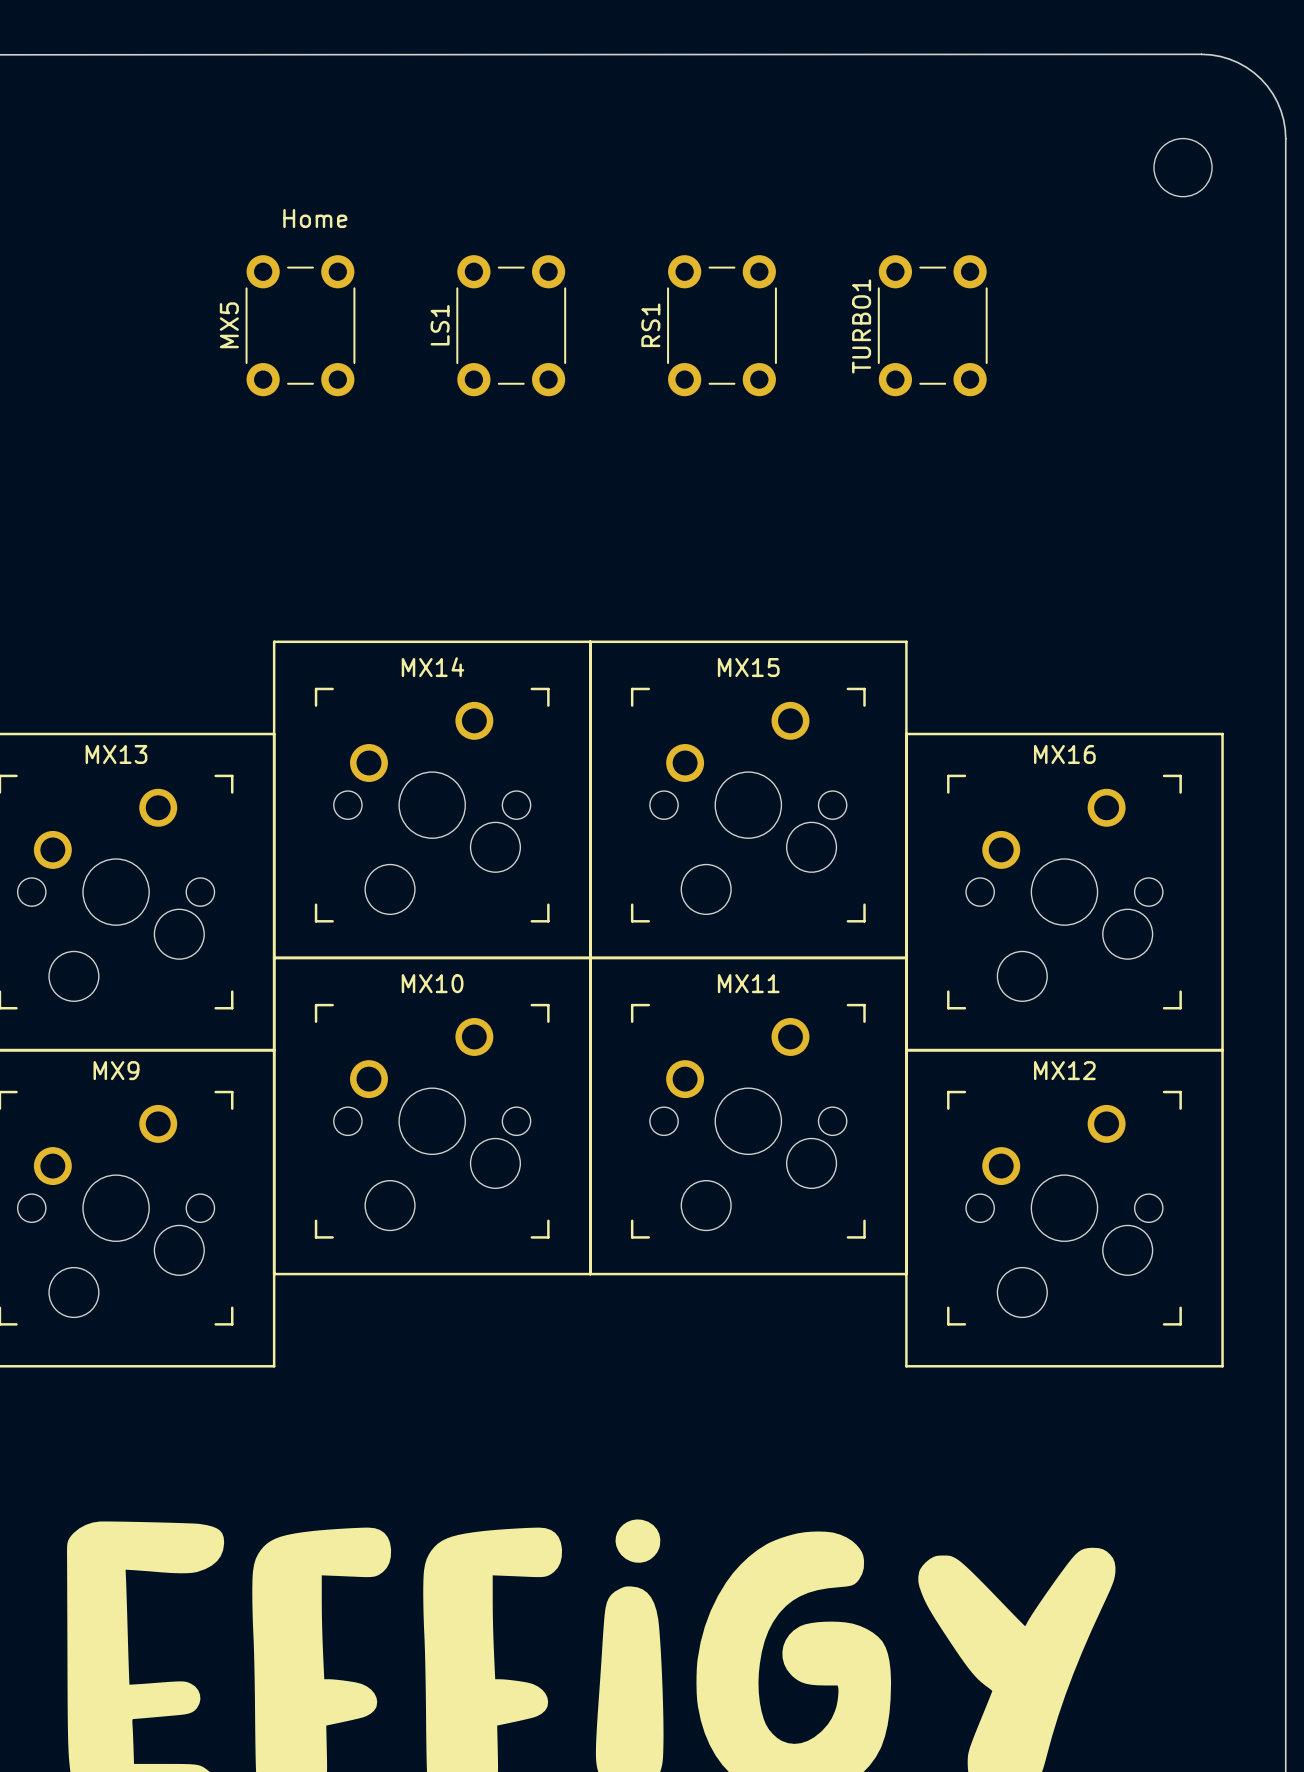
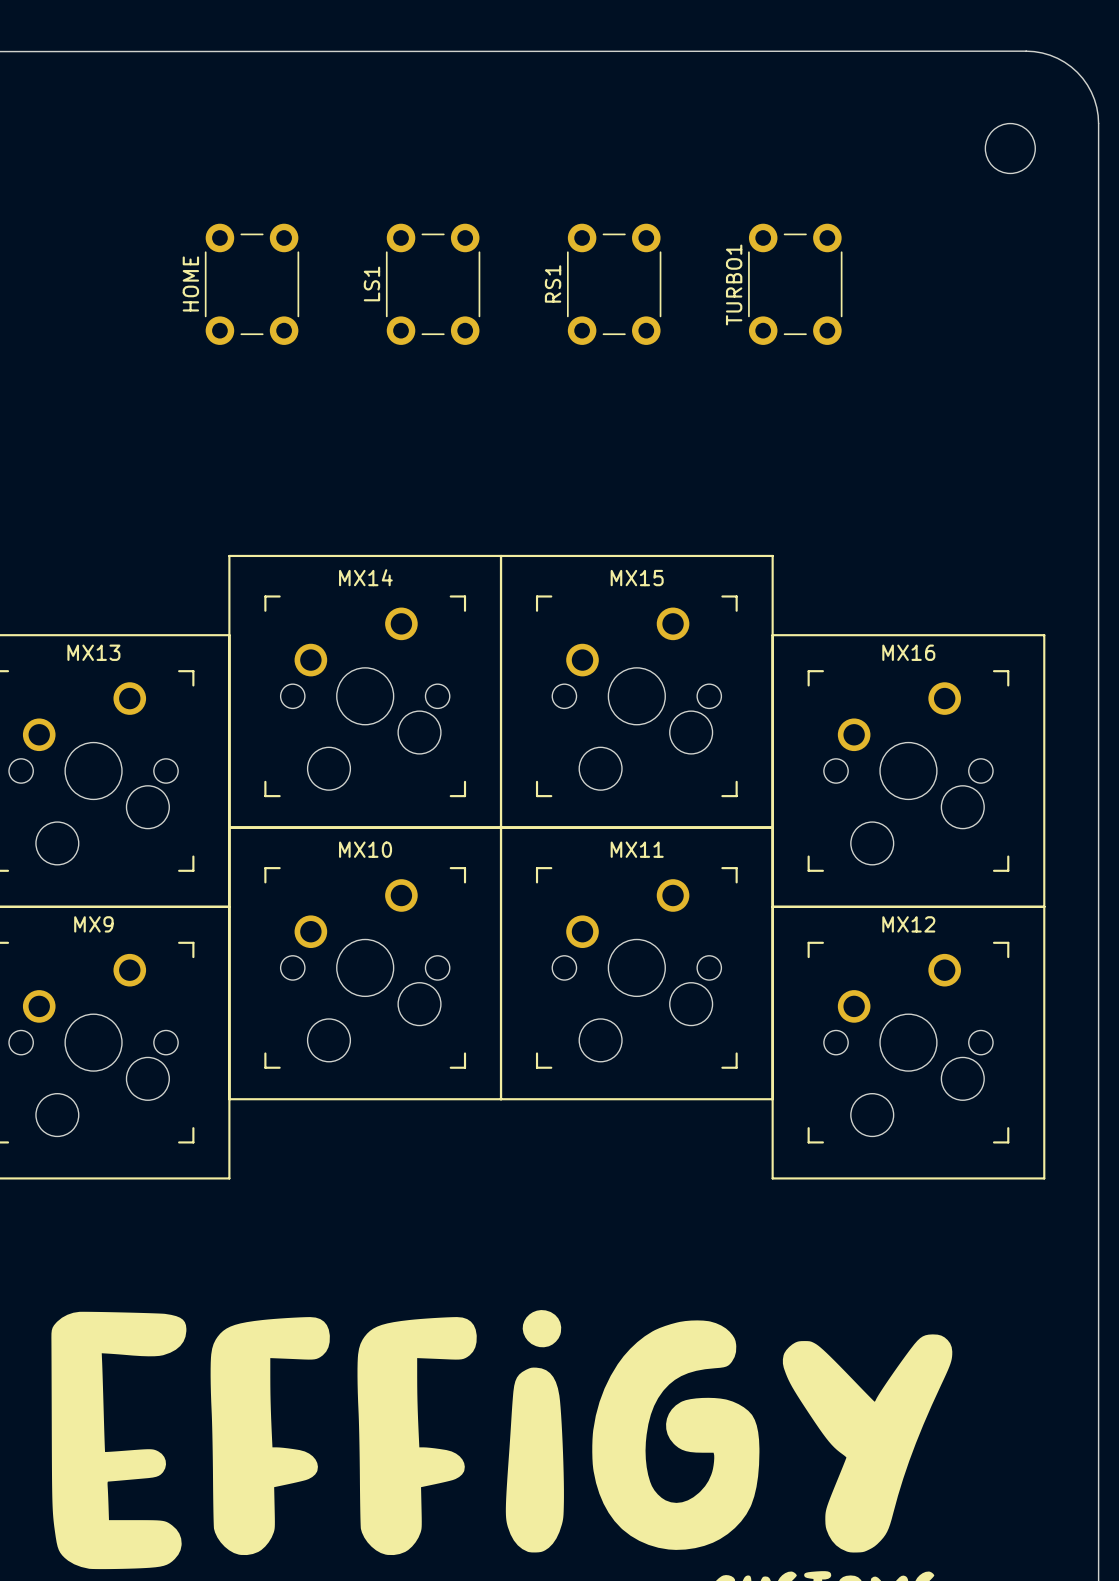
text: Home (315, 218) -> none
MX5 name: MX5 (229, 325) -> HOME (190, 283)

